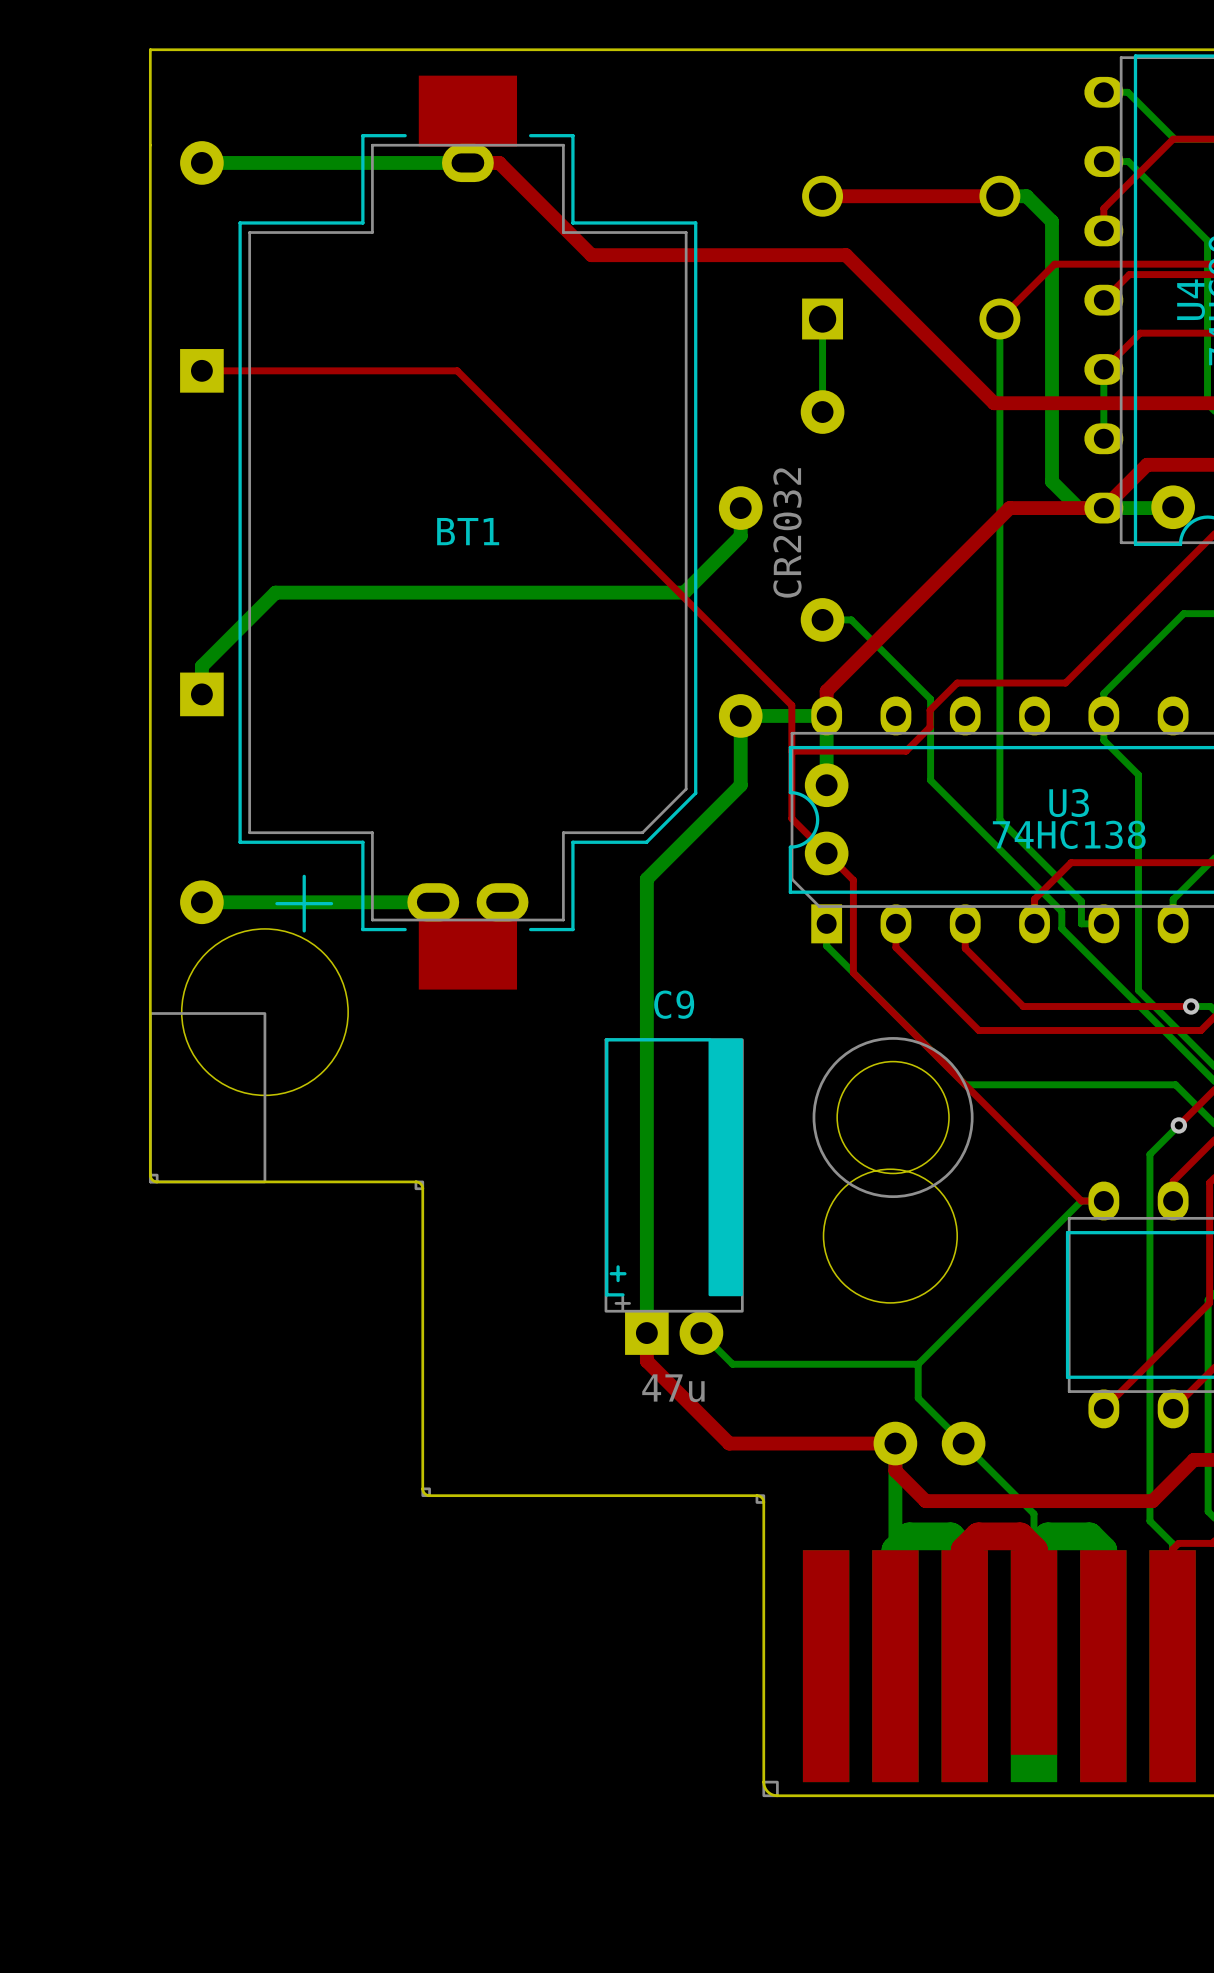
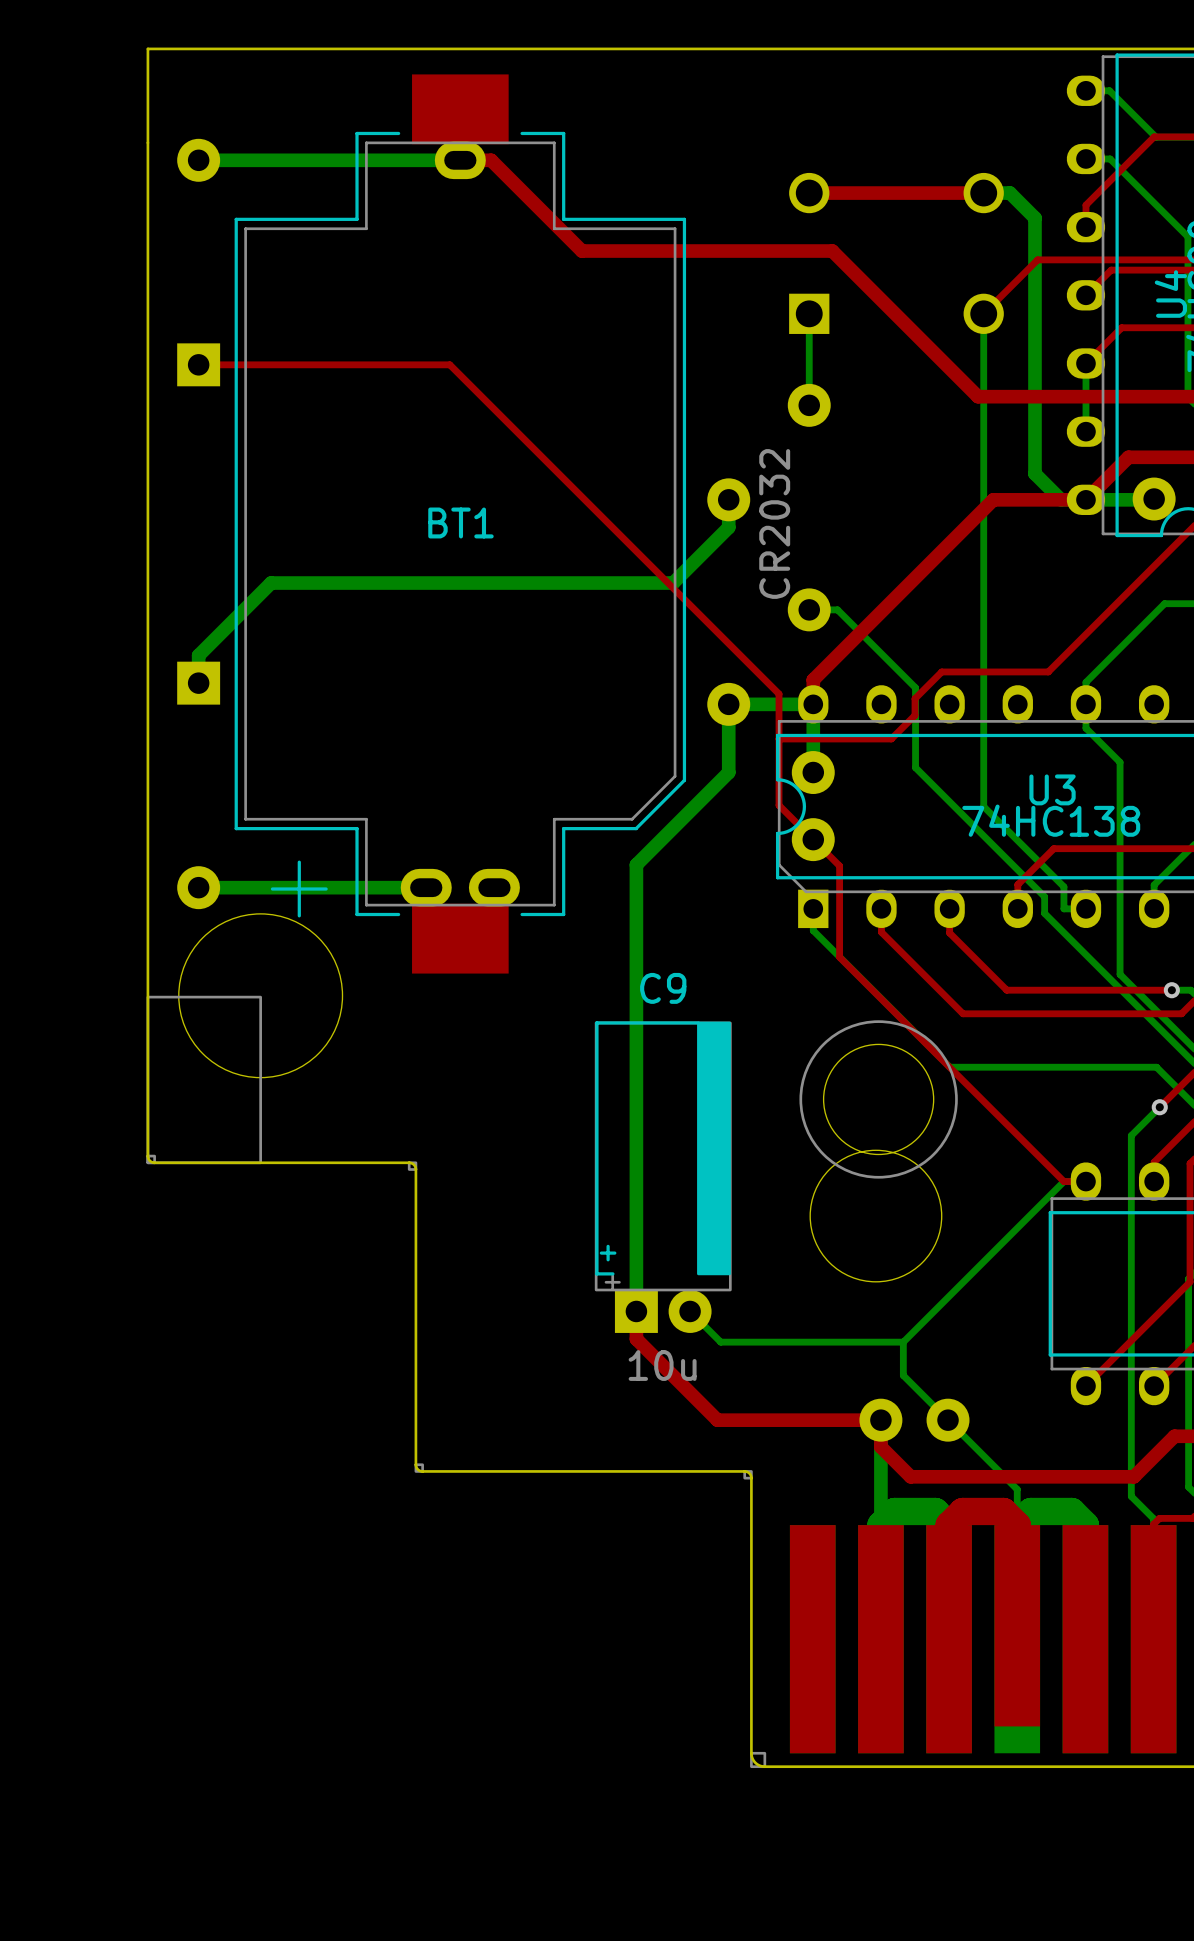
C9 value: 47u (673, 1388) -> 10u (662, 1365)

